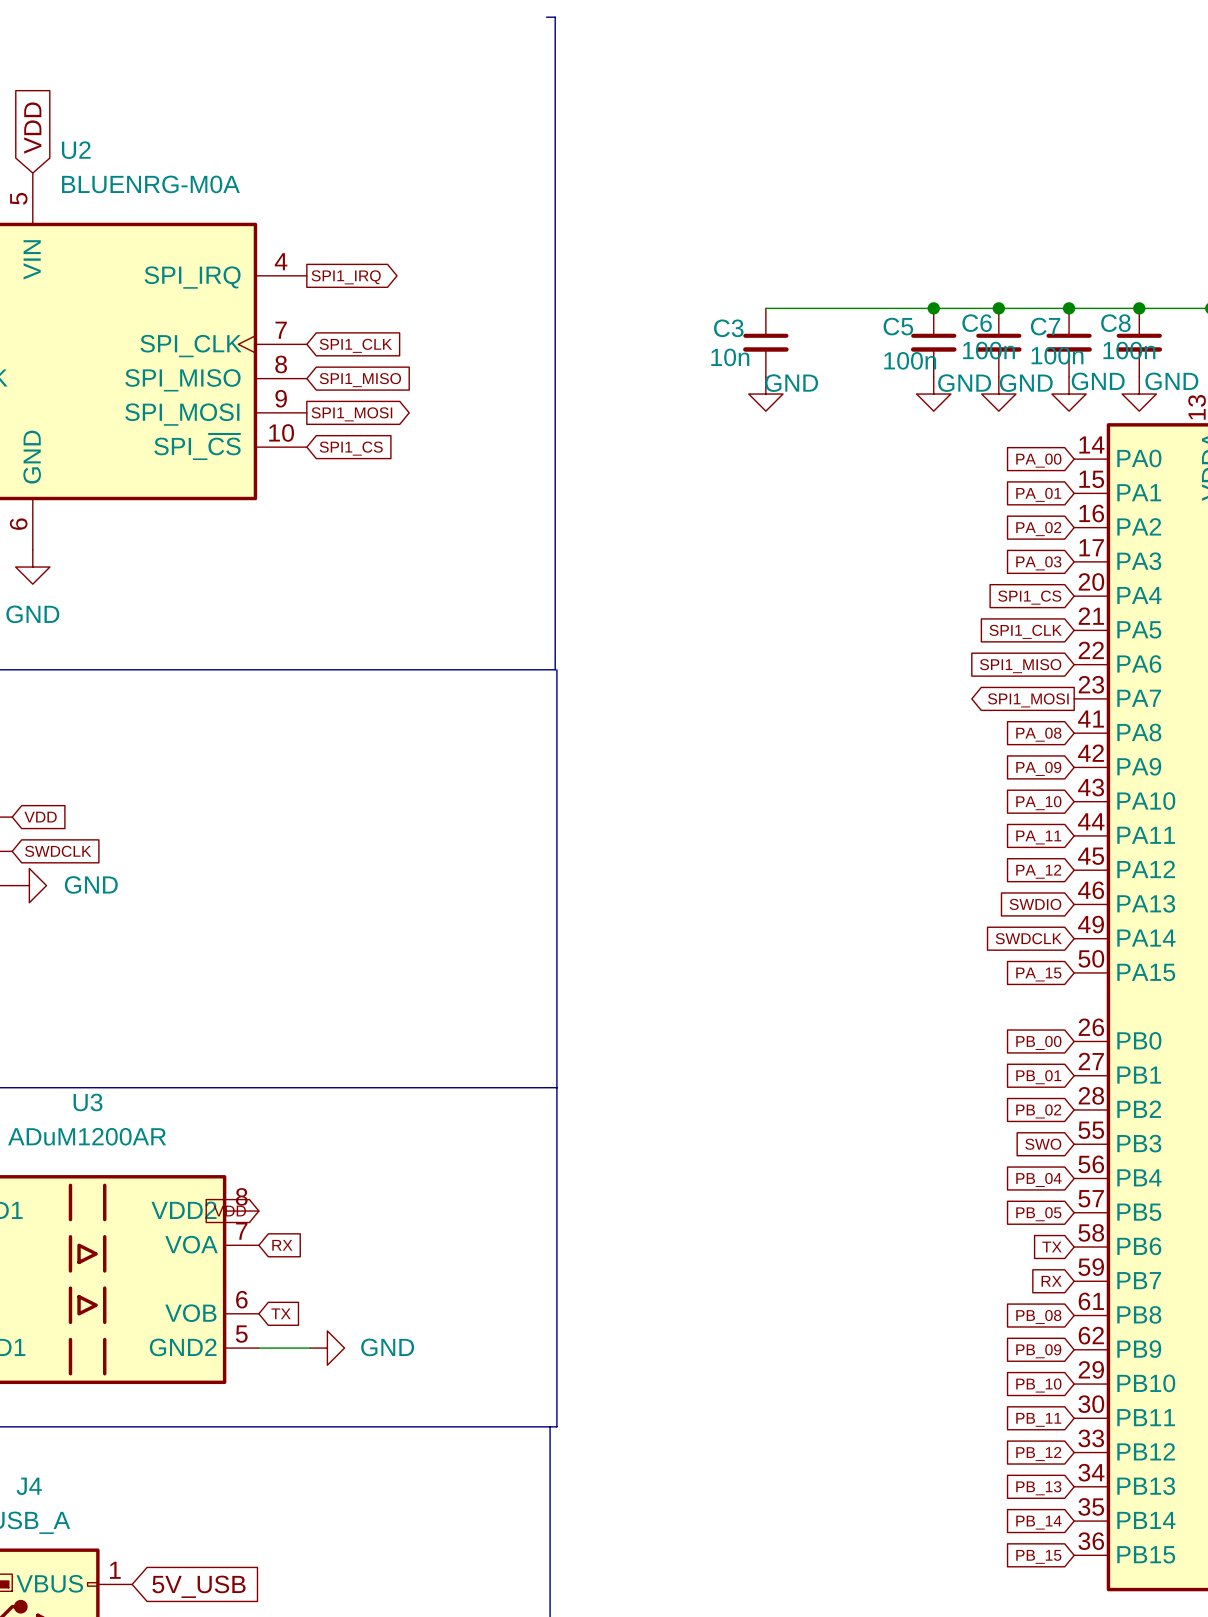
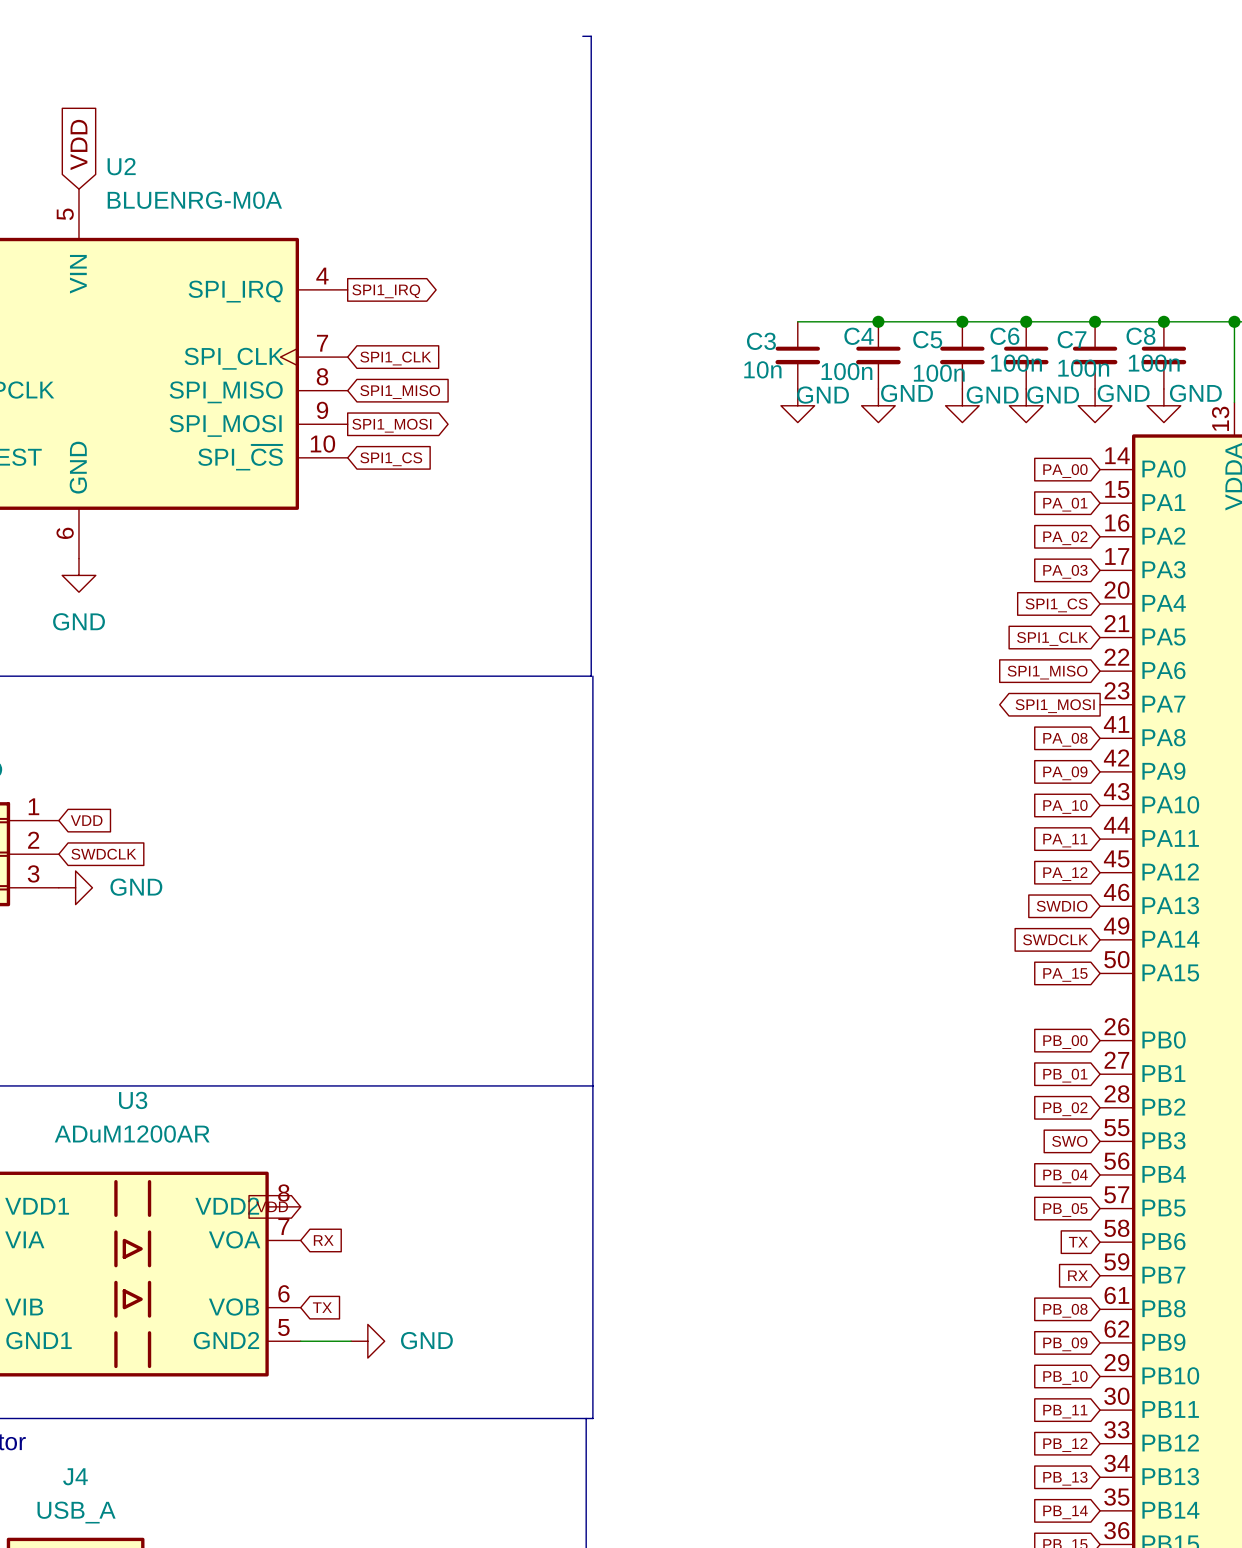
junction: none -> (878, 321)
C4: none -> 100n (878, 355)
power symbol: none -> GND (878, 405)

